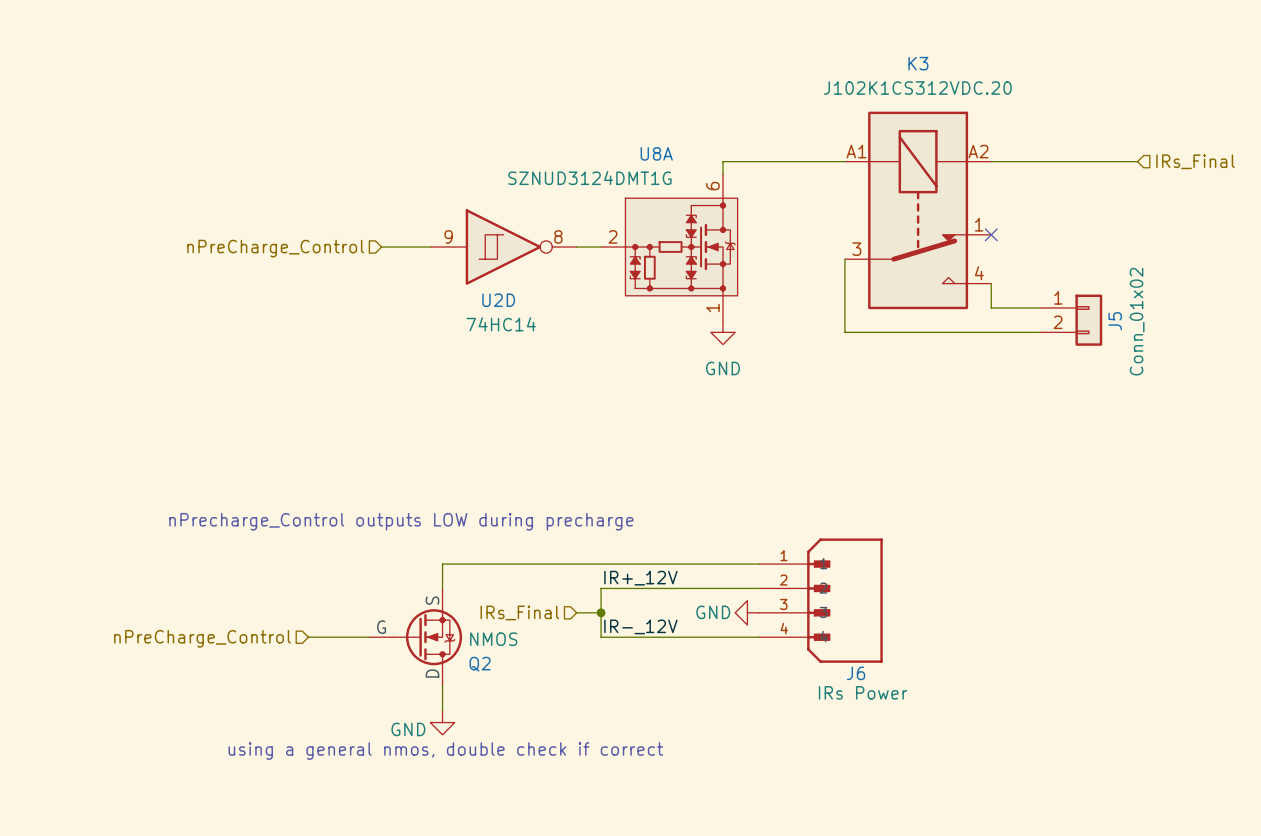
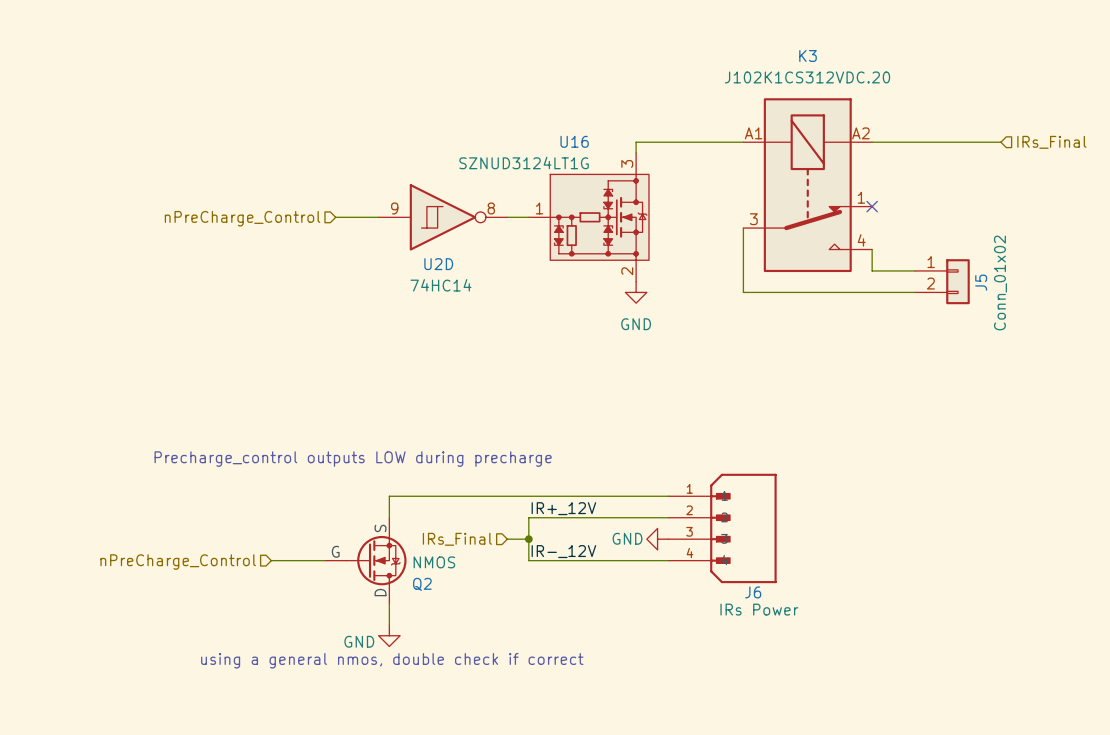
U8A name: U8A (656, 153) -> U16 (574, 141)
U8A value: SZNUD3124DMT1G (589, 177) -> SZNUD3124LT1G (524, 163)
U8A pin number: 6 (712, 186) -> 3 (627, 163)
U8A pin number: 2 (612, 236) -> 1 (539, 208)
U8A pin number: 1 (712, 307) -> 2 (627, 271)
text: nPrecharge_Control outputs LOW during precharge (401, 521) -> Precharge_control outputs LOW during precharge (353, 459)

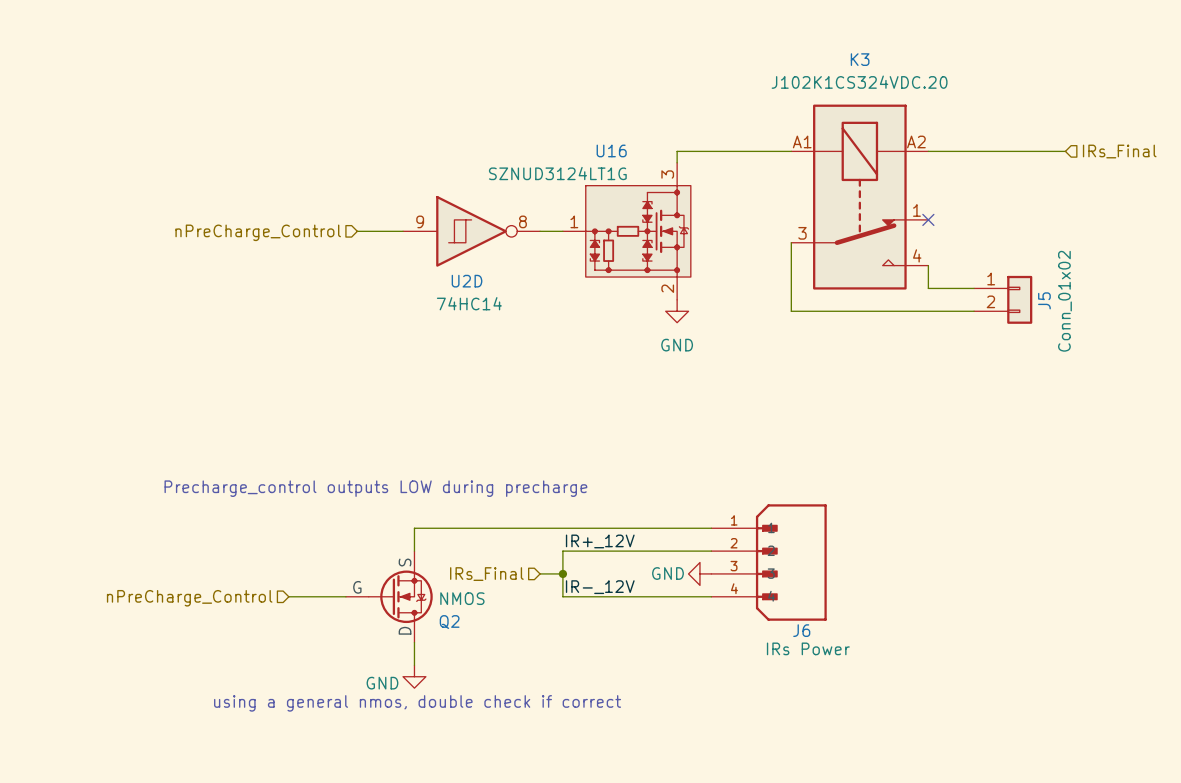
K3 value: J102K1CS312VDC.20 (807, 77) -> J102K1CS324VDC.20 (859, 82)

